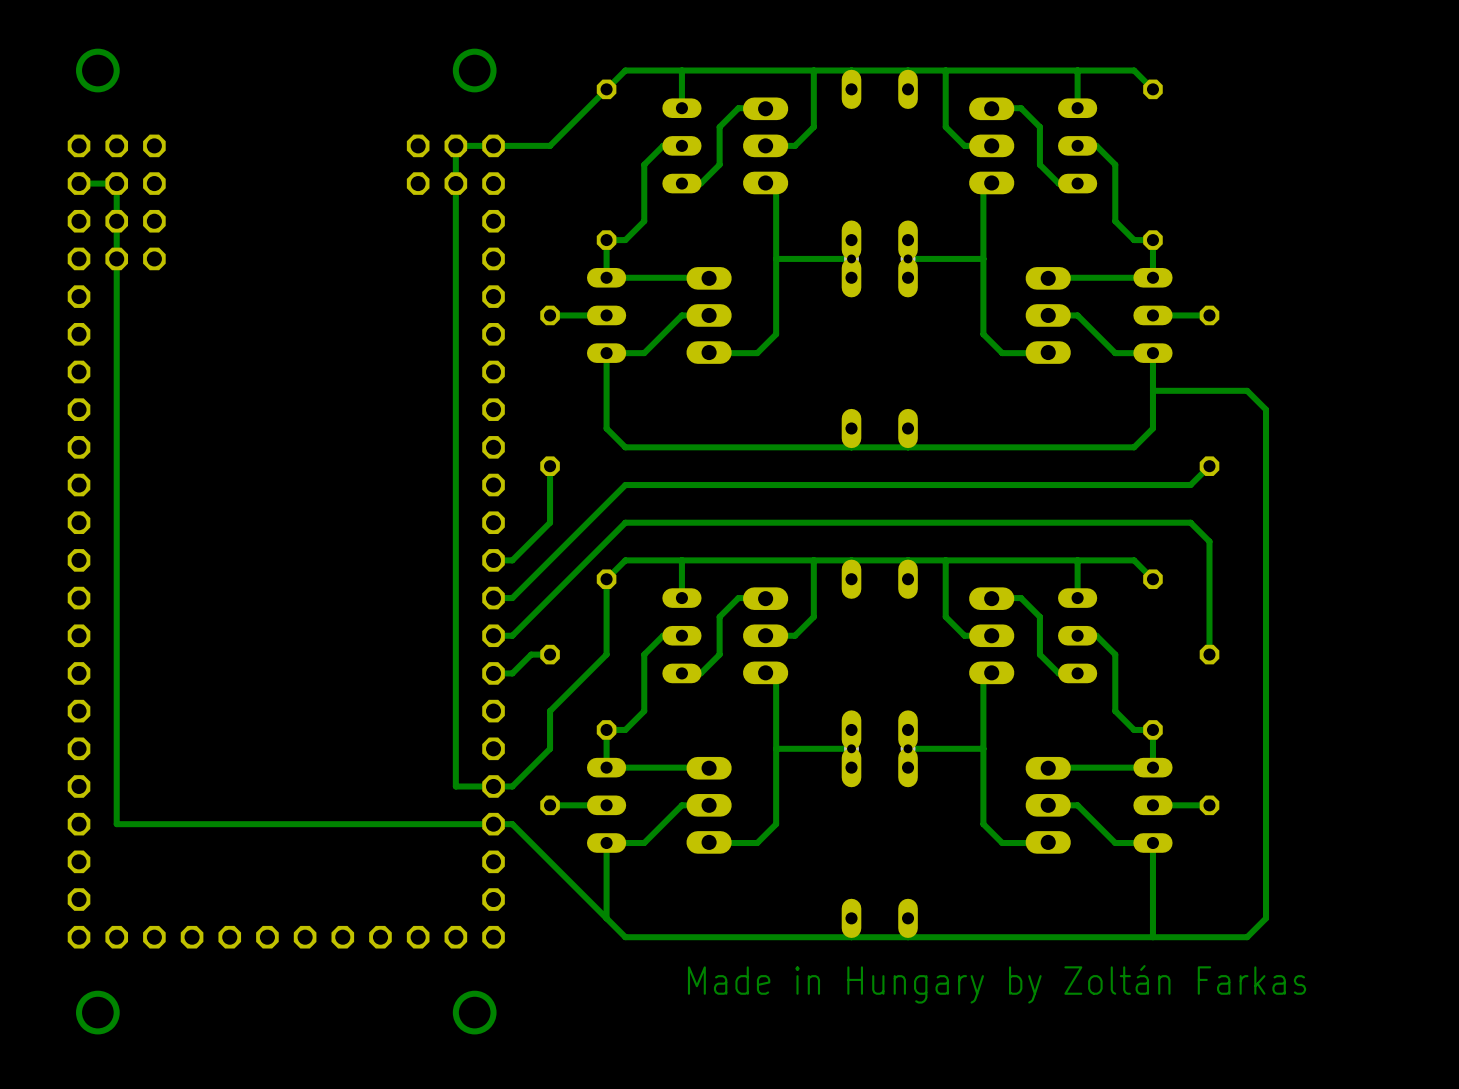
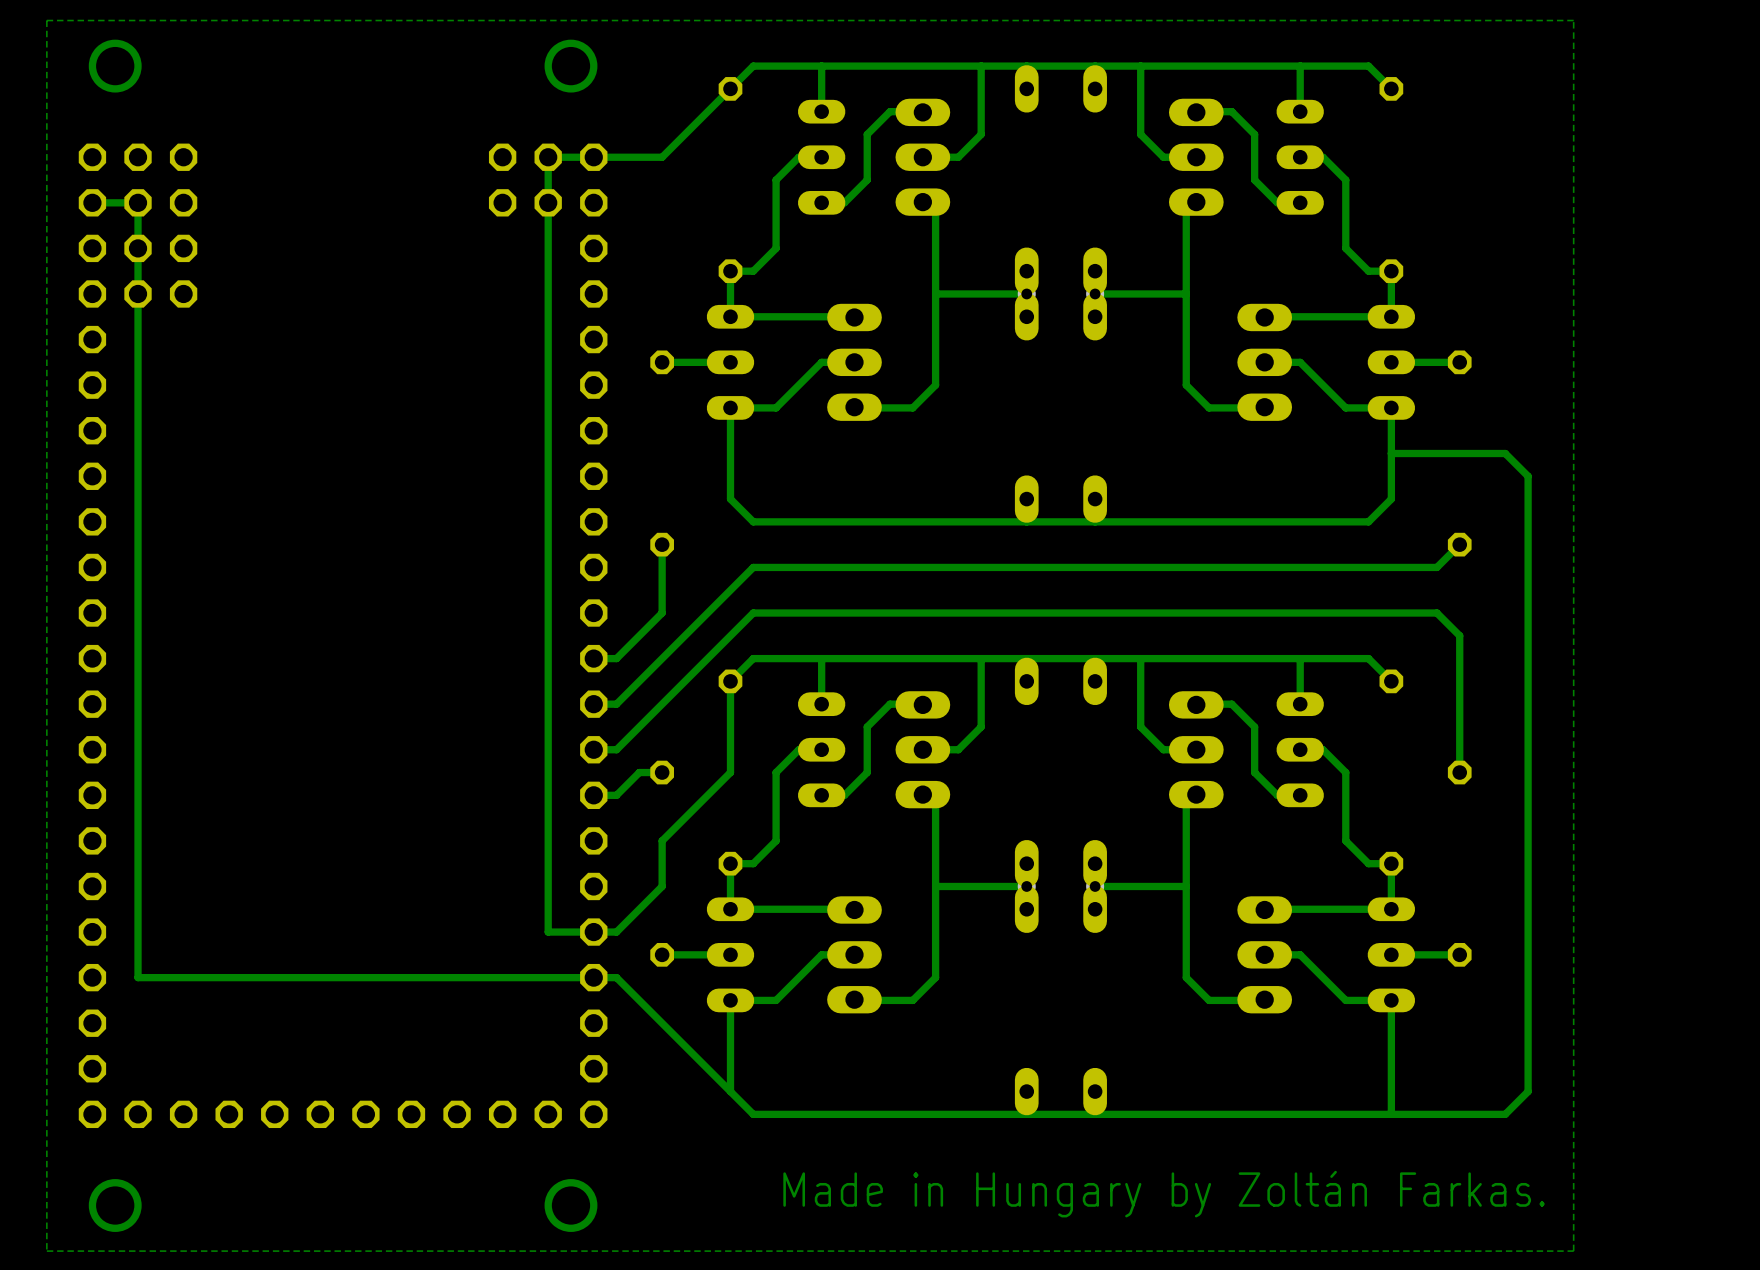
bottom zone outline: none -> (1573, 20) (1573, 1251) (46, 1251) (46, 20) (1573, 20)
text: Made in Hungary by Zoltán Farkas (997, 984) -> Made in Hungary by Zoltán Farkas. (1164, 1194)

